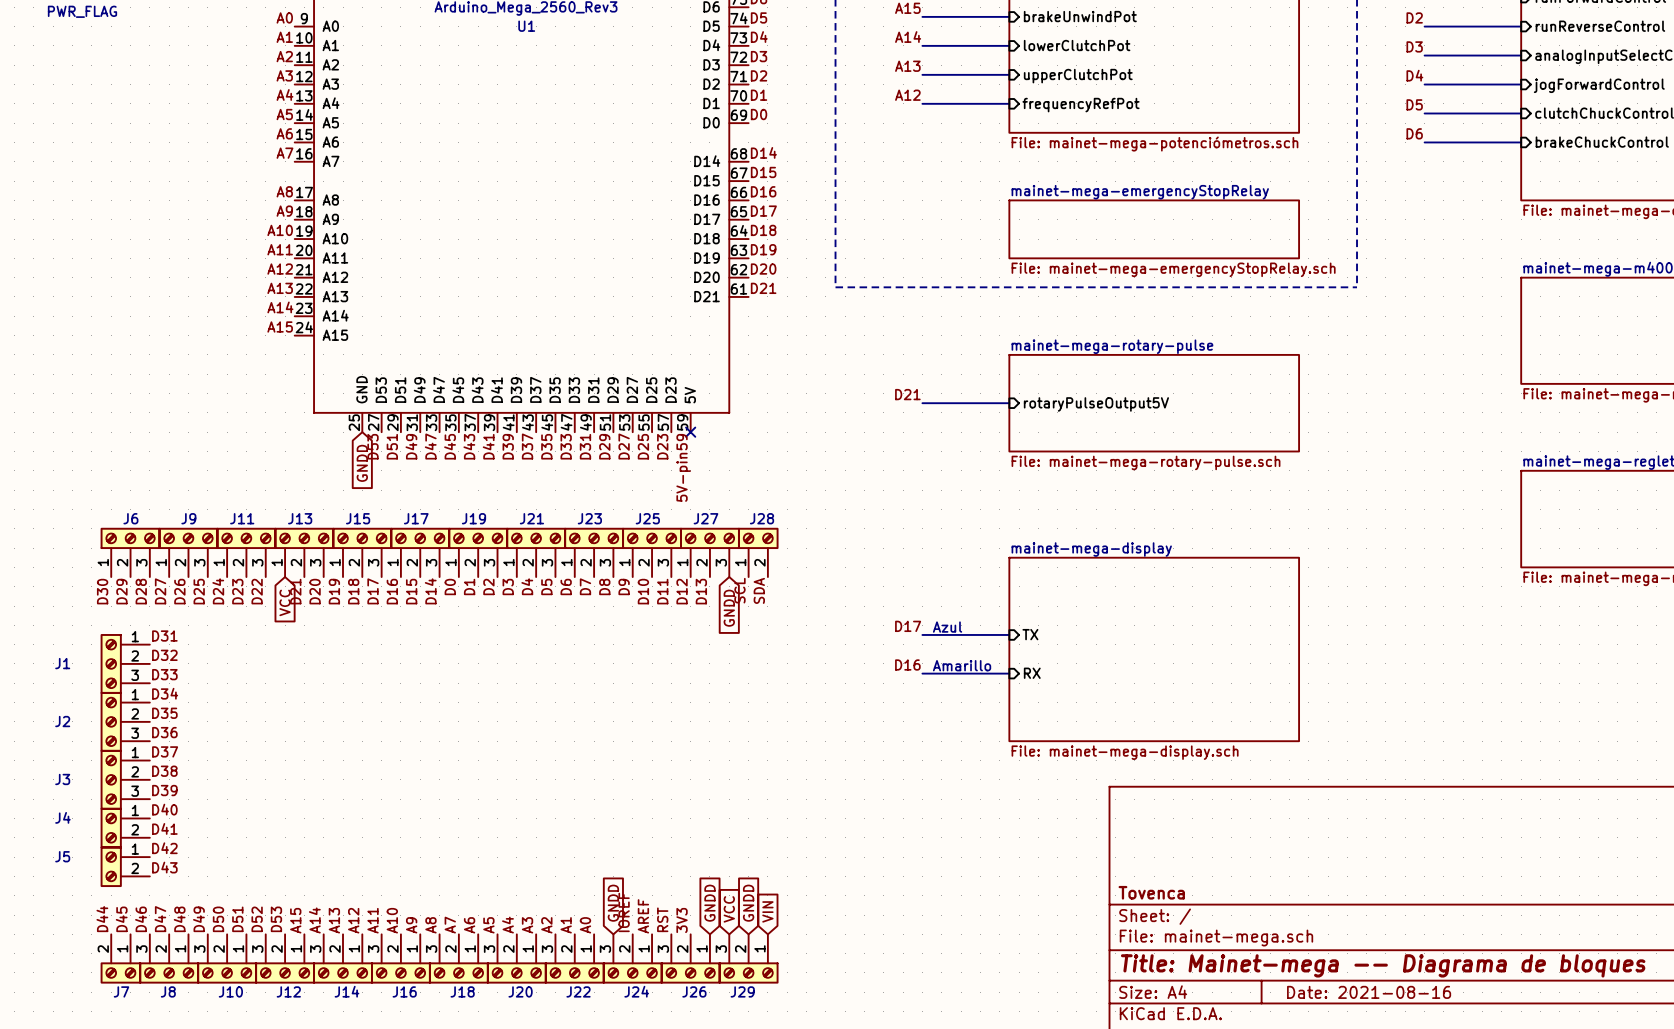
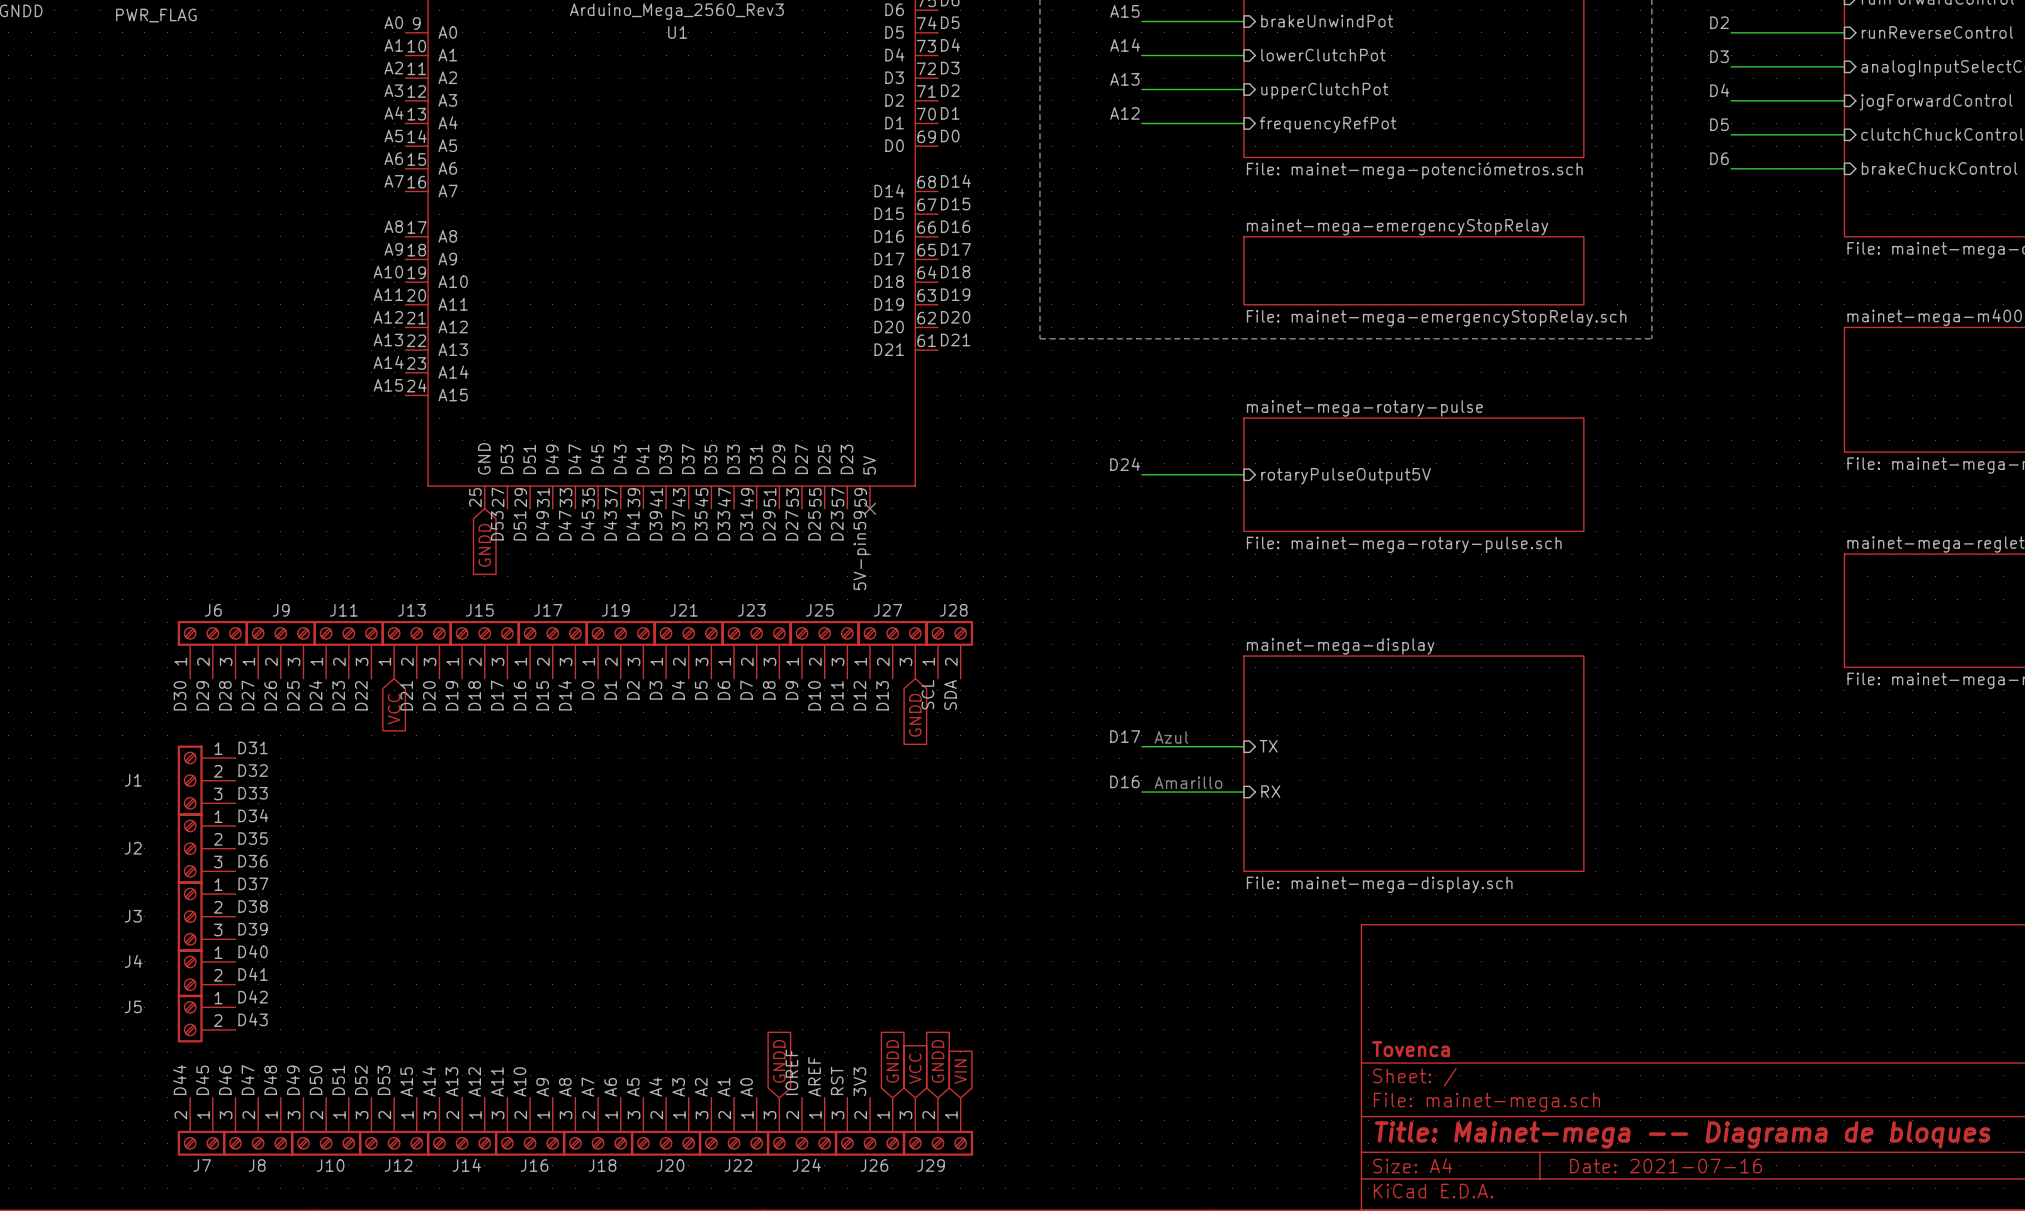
label: D21 (907, 394) -> D24 (1125, 464)
title block: Date: 2021-08-16 (1369, 992) -> Date: 2021-07-16 (1666, 1166)

